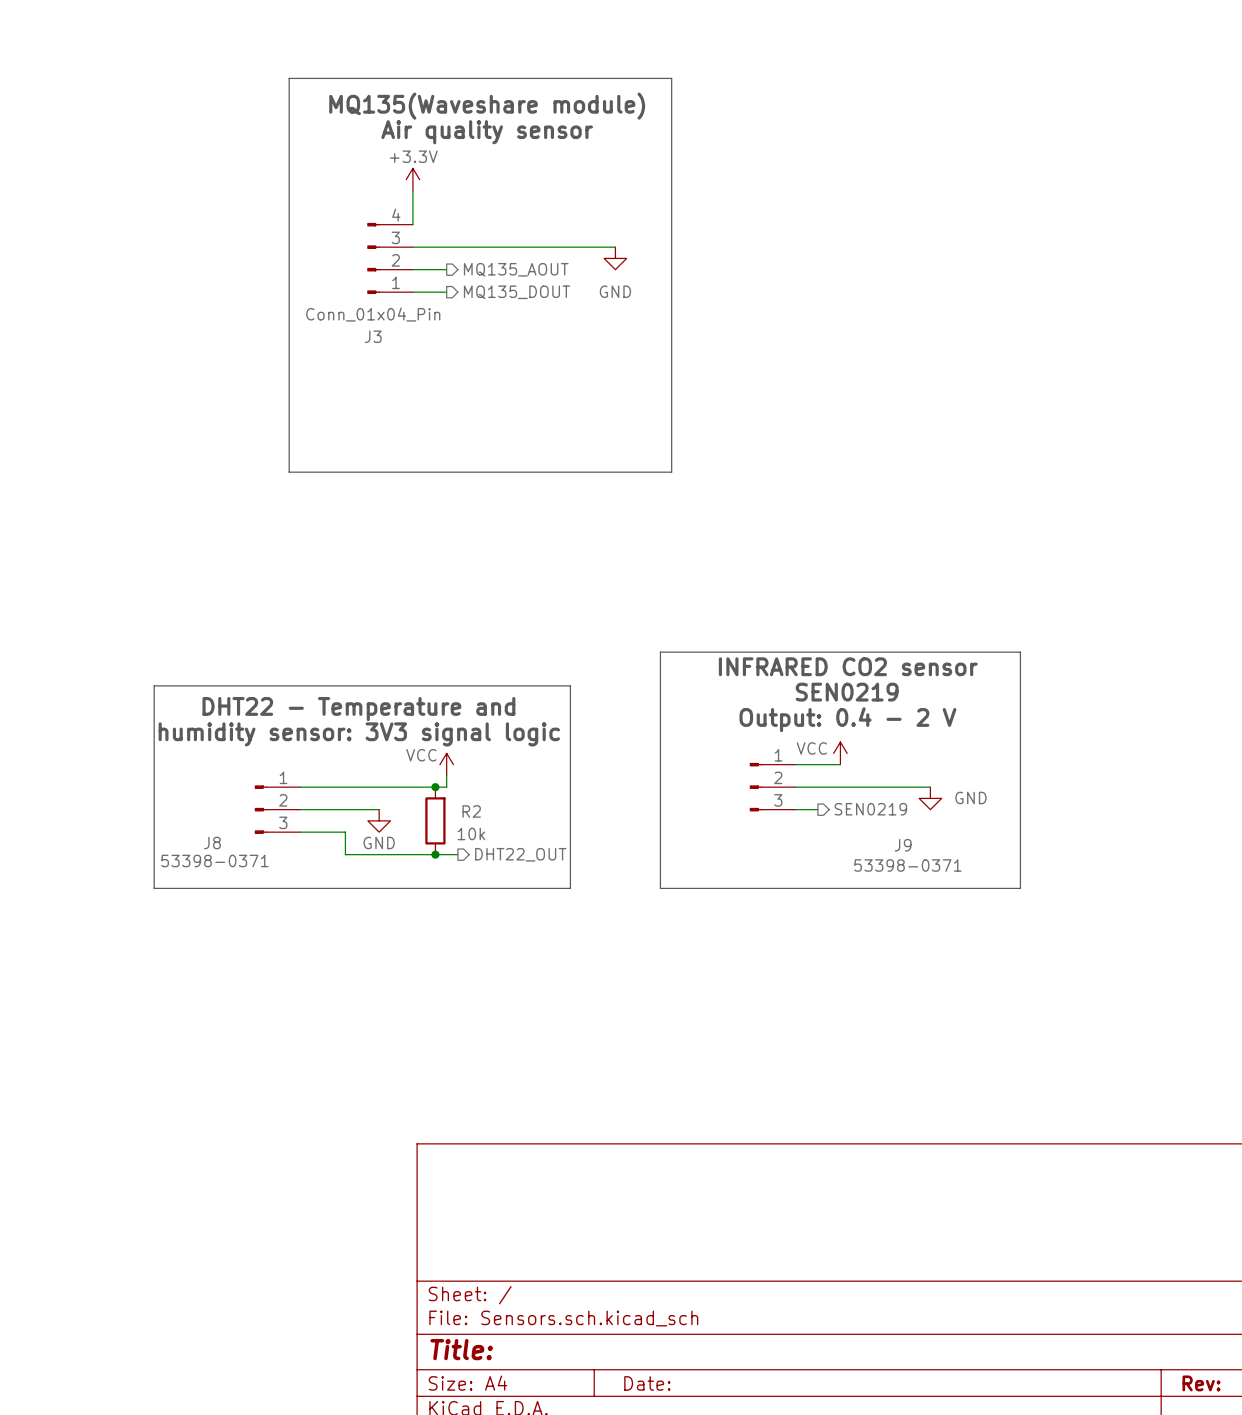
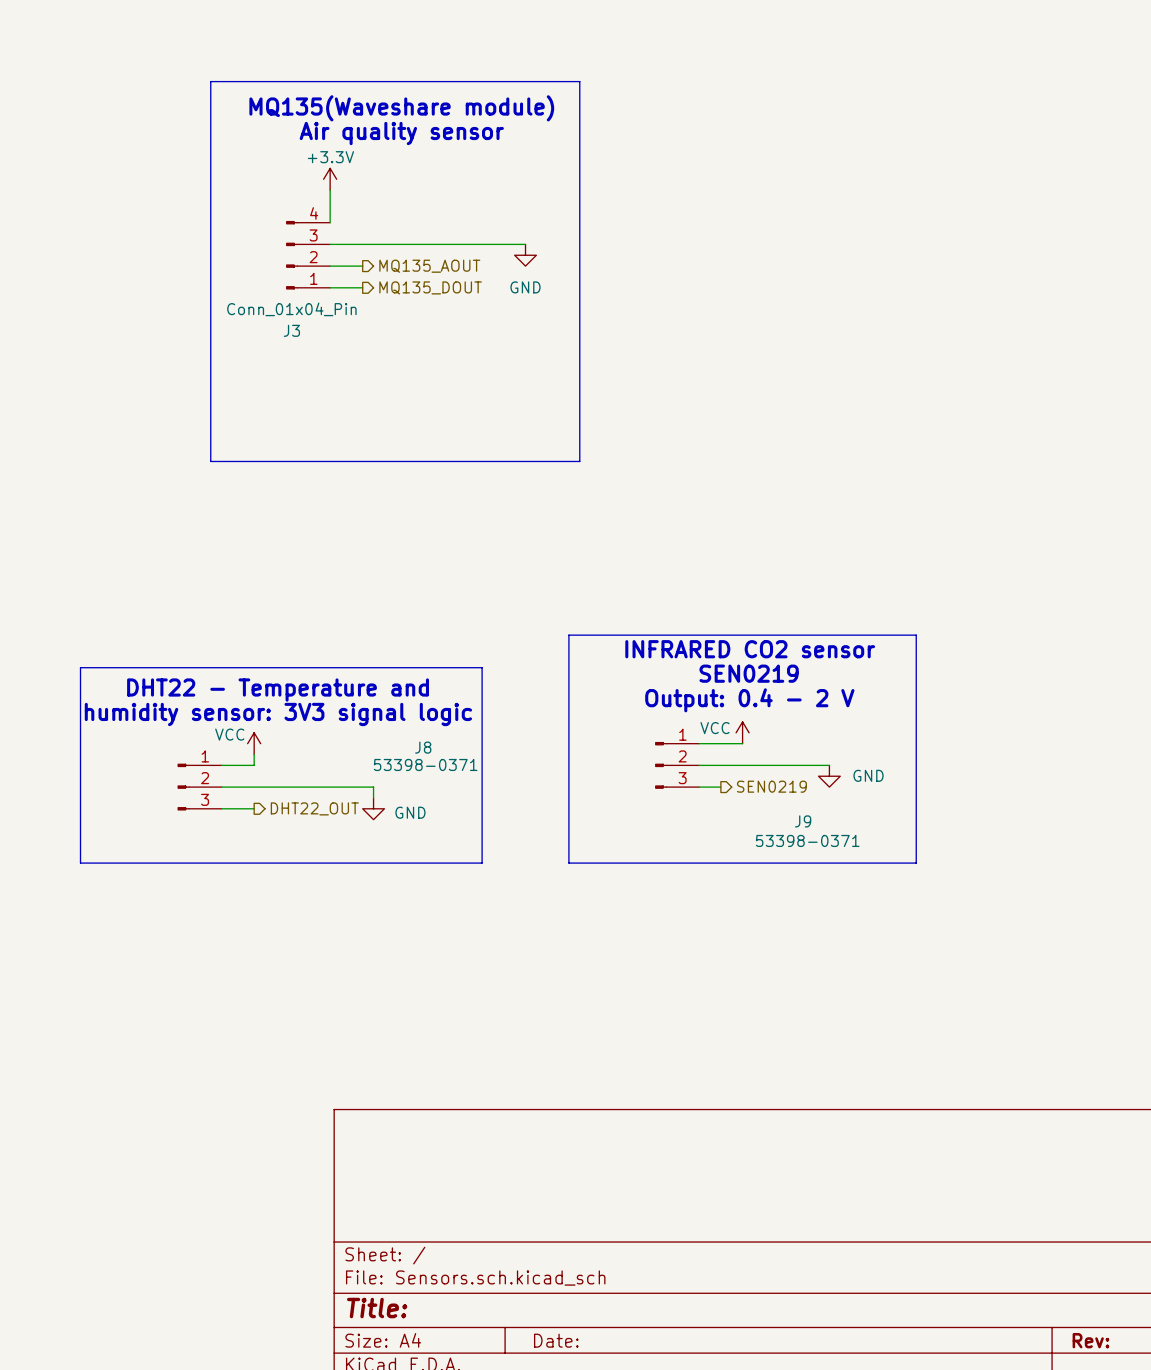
power symbol position: VCC (446, 764) -> VCC (254, 743)
wire: (446, 775) (446, 787) (334, 787) -> (254, 754) (254, 765)
junction: (435, 787) -> none
wire: none -> (297, 787) (373, 787) (373, 797)
power symbol position: GND (379, 820) -> GND (373, 808)
R2: 10k (435, 820) -> none
wire: (334, 832) (345, 832) (345, 854) (457, 854) -> none
J8 name position: J8 (212, 842) -> J8 (423, 747)
power symbol text position: GND (379, 842) -> GND (410, 812)
junction: (435, 854) -> none
hierarchical label position: DHT22_OUT (520, 854) -> DHT22_OUT (314, 808)
J8 value position: 53398-0371 (214, 860) -> 53398-0371 (425, 764)

